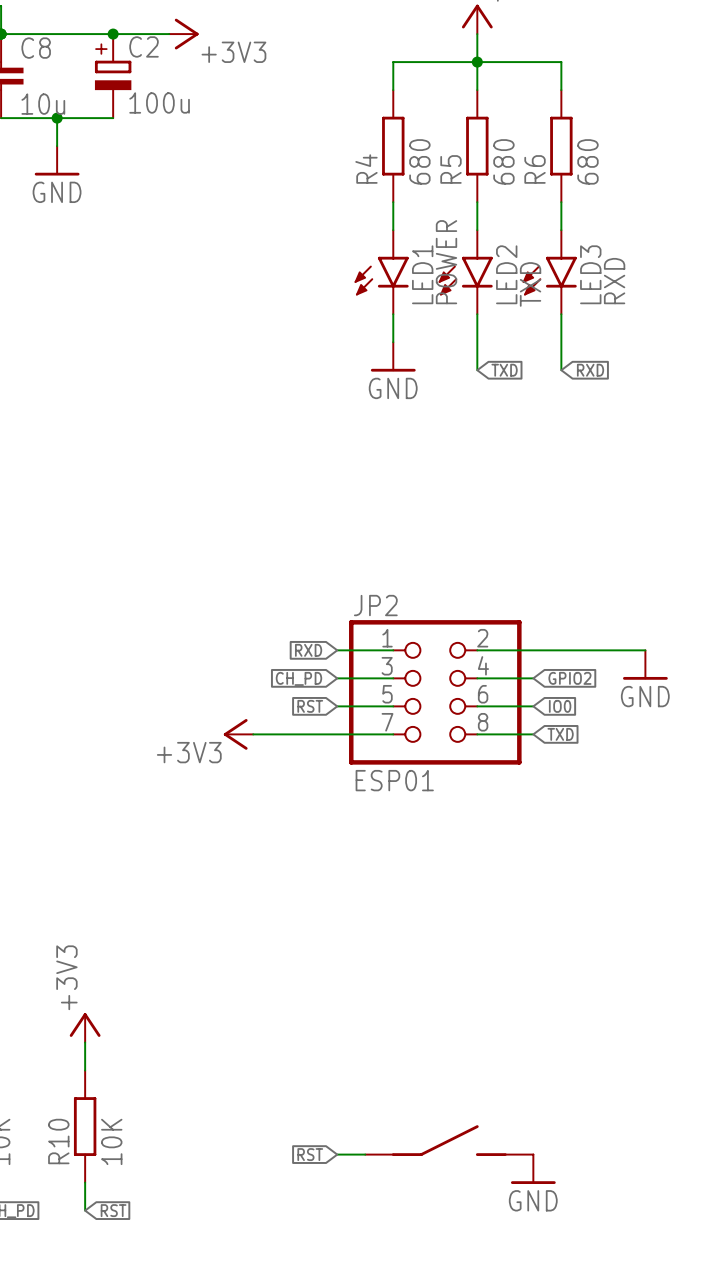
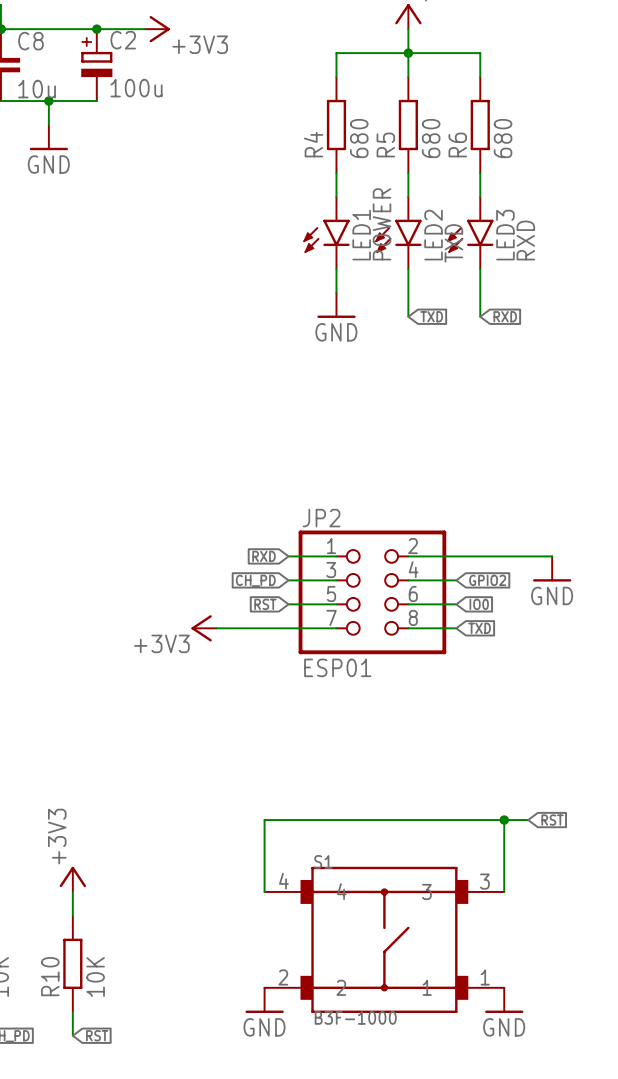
wire: none -> (504, 820) (504, 891)
junction: none -> (504, 820)
wire: none -> (528, 820) (264, 820) (264, 891)
global label: none -> RST (552, 820)
S1: none -> B3F-1000 (384, 939)
part: (449, 1140) -> none
global label: RST (310, 1154) -> none
power symbol: none -> GND (264, 1000)
power symbol position: GND (533, 1169) -> GND (504, 1000)

